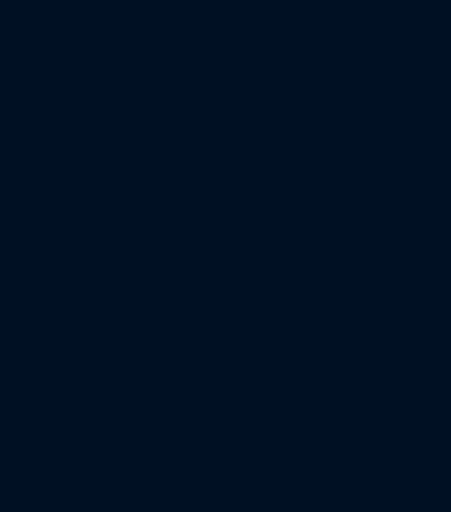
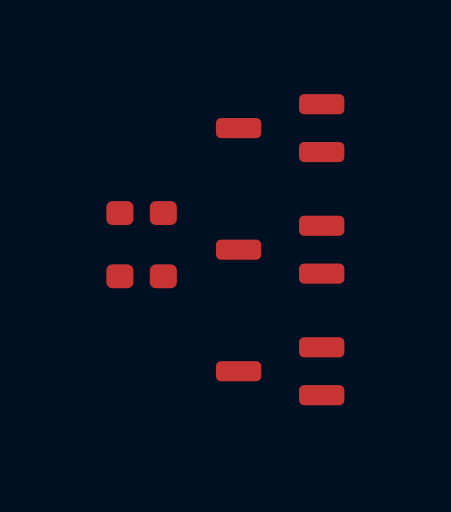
part: none -> (280, 128)
part: none -> (141, 213)
part: none -> (280, 249)
part: none -> (141, 276)
part: none -> (280, 371)

